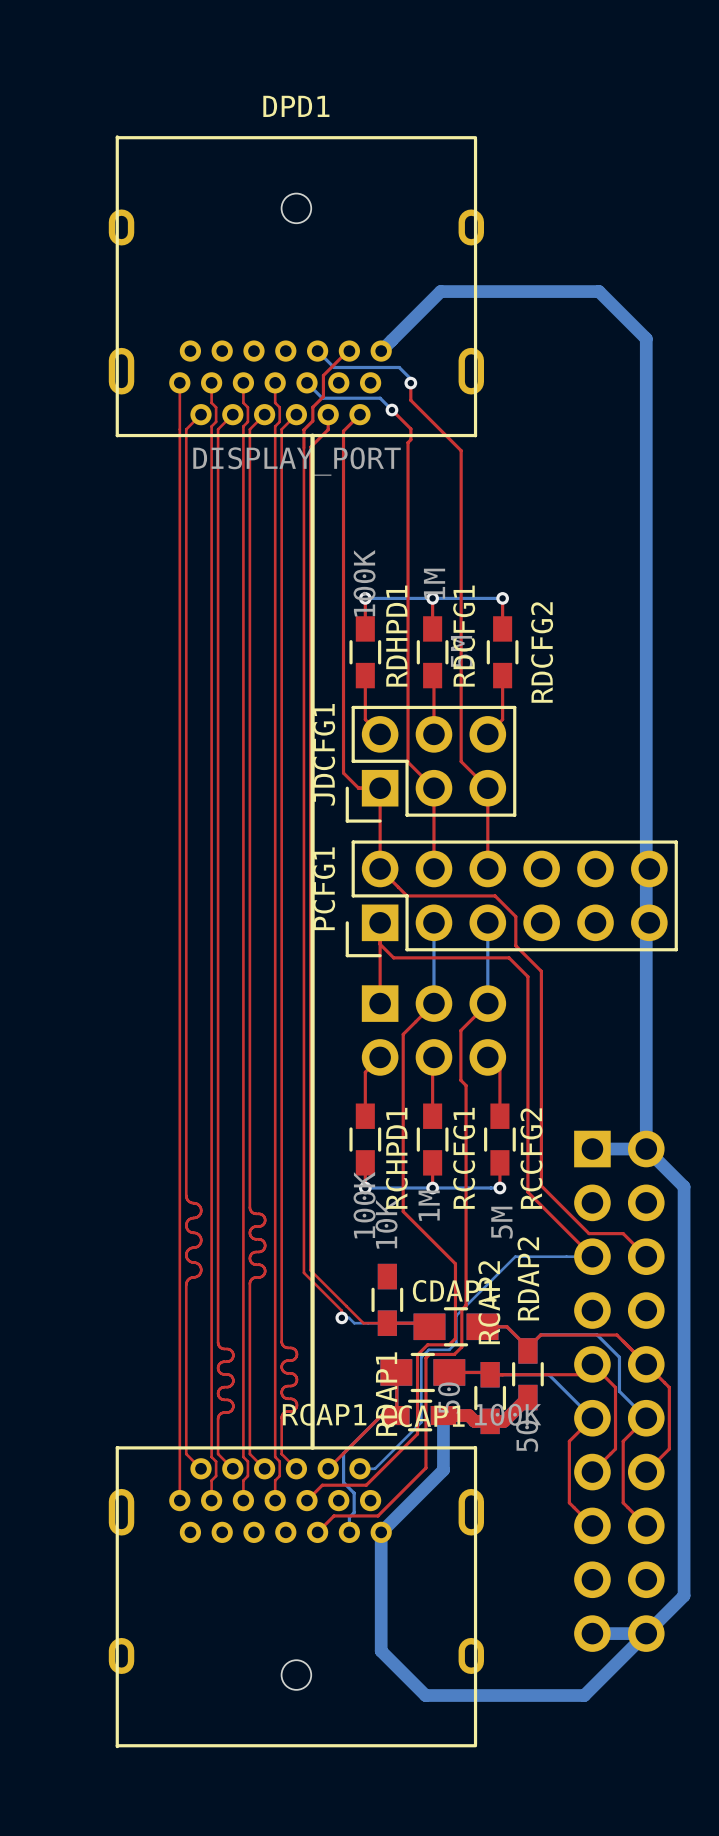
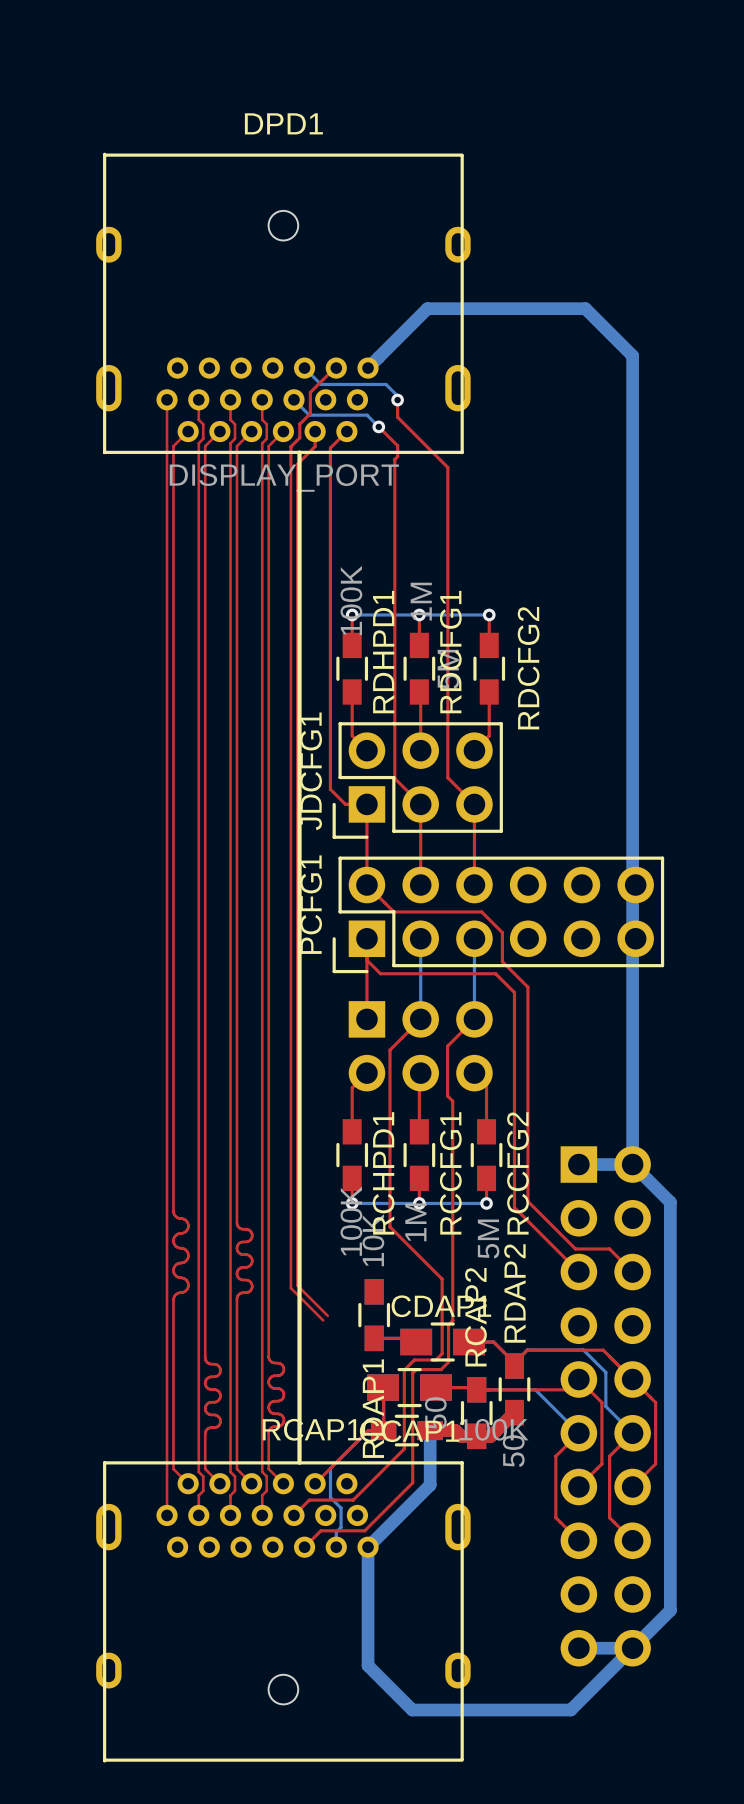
bottom track: (592, 1256) (515, 1256) (456, 1315) (456, 1342) (449, 1349) (428, 1349) (421, 1357) (421, 1422) (374, 1468) (360, 1468) -> none
top track: (340, 1300) (363, 1323) (387, 1323) -> none
top track: (336, 1305) (341, 1310) (341, 1317) -> none
bottom track: (341, 1317) (348, 1317) (354, 1323) (387, 1323) -> none
via: (341, 1317) -> none

